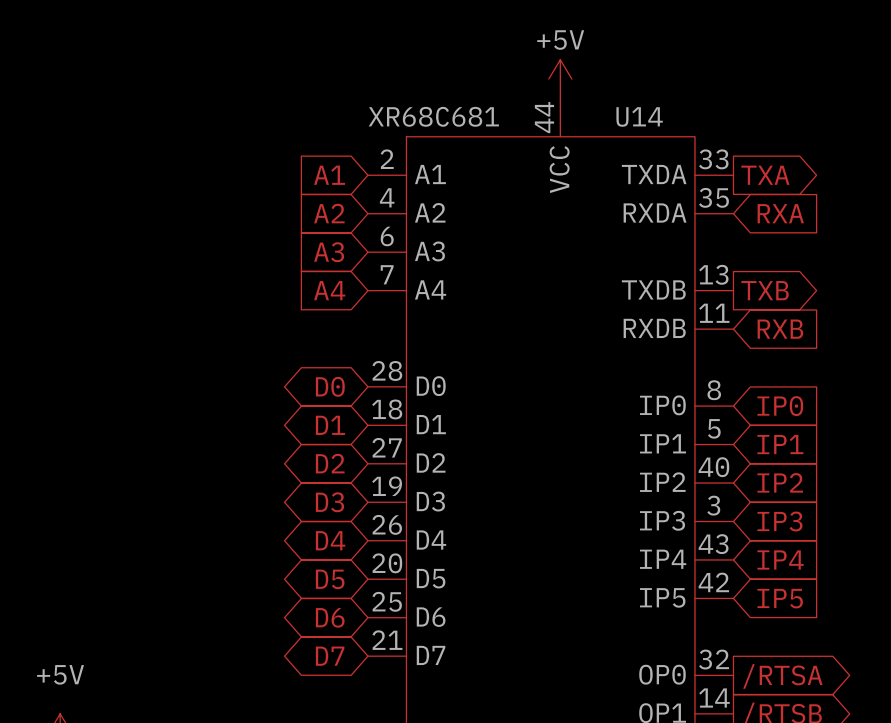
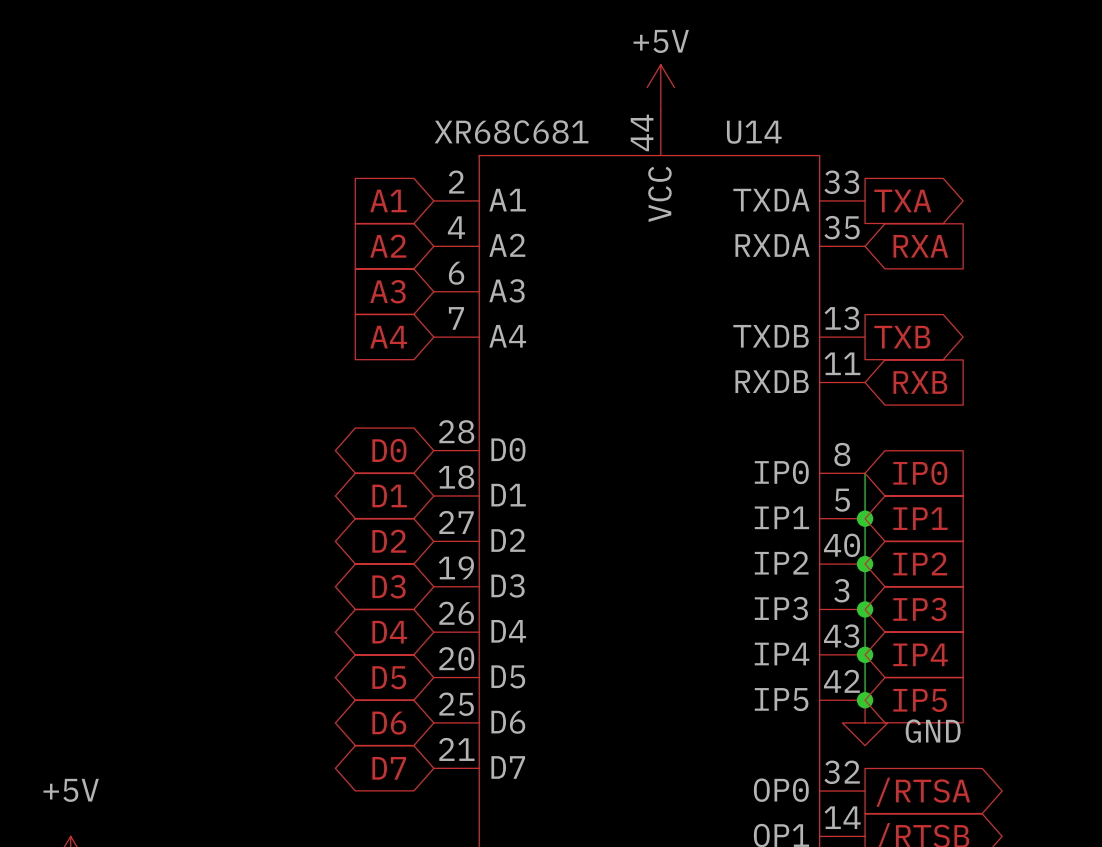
wire: none -> (865, 473) (865, 700)
junction: none -> (865, 518)
junction: none -> (865, 564)
junction: none -> (865, 609)
junction: none -> (865, 654)
junction: none -> (865, 700)
power symbol: none -> GND (865, 722)

